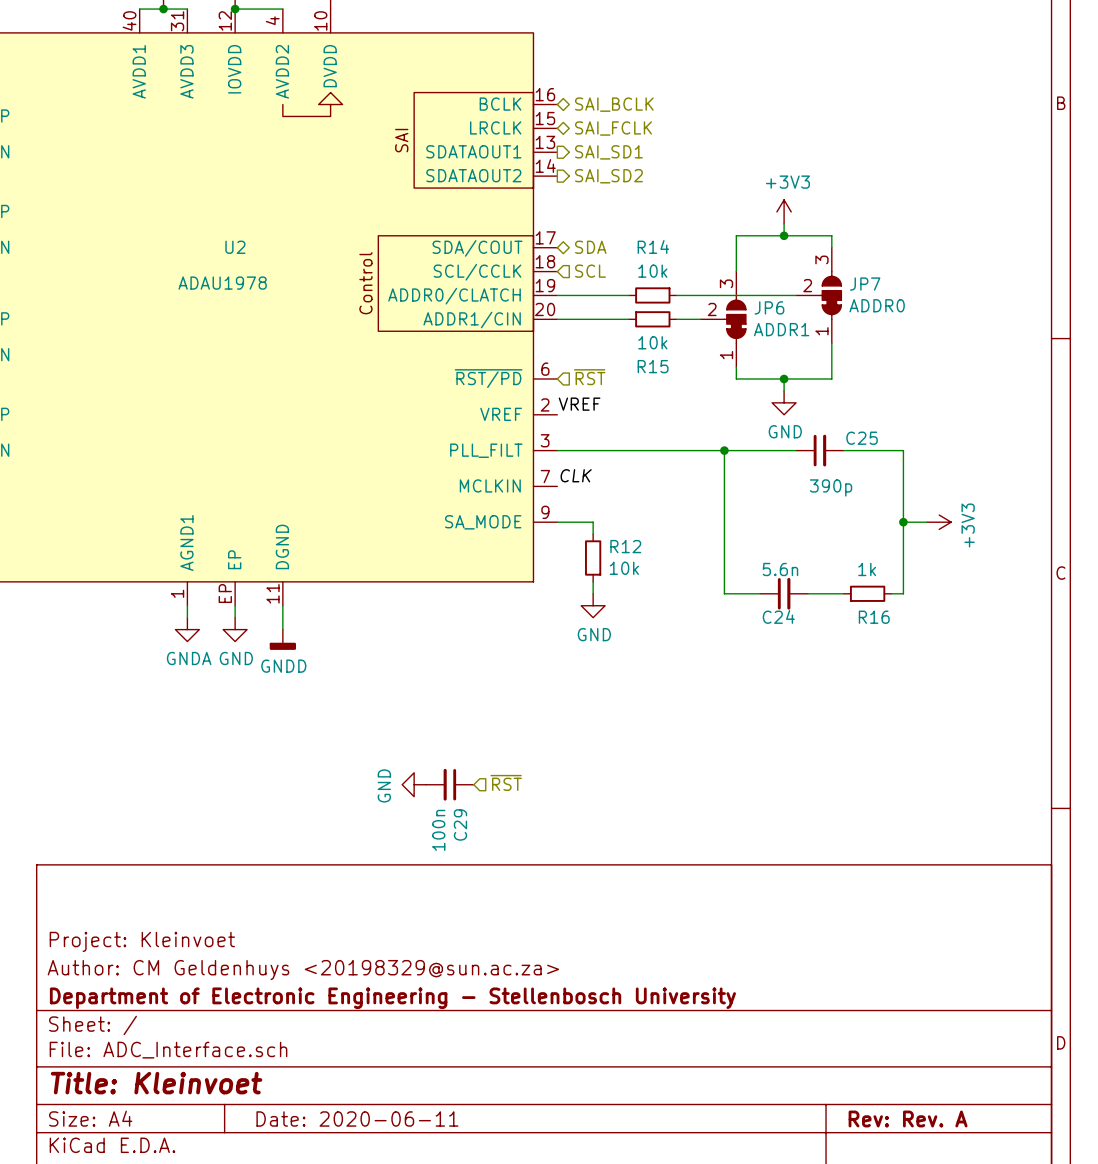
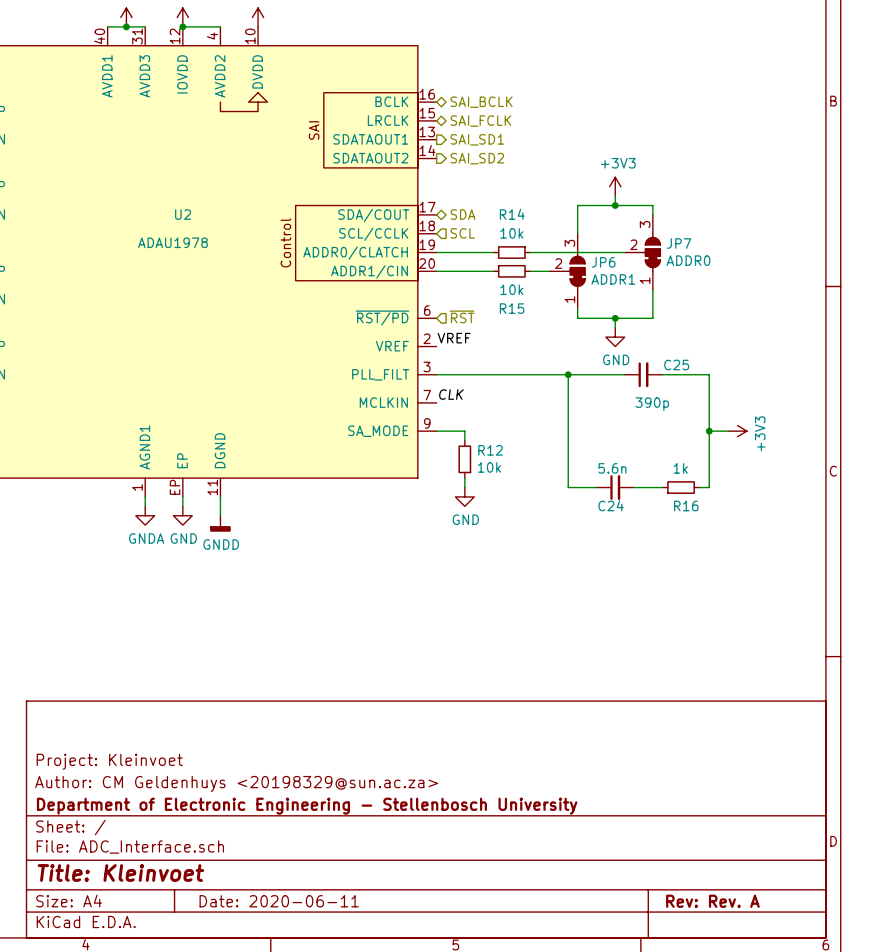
hierarchical label: ~{RST} (506, 782) -> none
power symbol: GND (414, 784) -> none
C29: 100n (449, 784) -> none

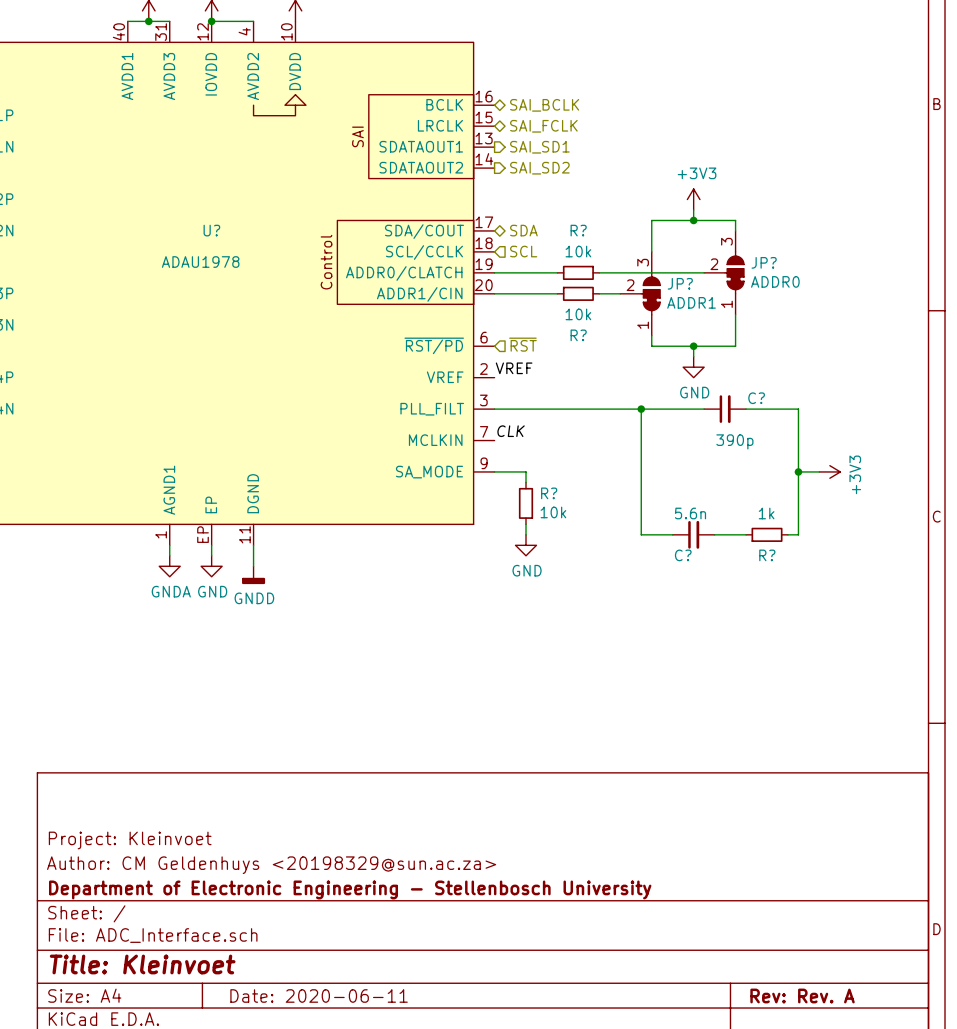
U2 name: U2 (183, 214) -> U? (211, 230)
R14 name: R14 (512, 214) -> R? (578, 230)
JP7 name: JP7 (679, 243) -> JP? (764, 262)
JP6 name: JP6 (603, 262) -> JP? (680, 283)
R15 name: R15 (512, 308) -> R? (578, 335)
C25 name: C25 (676, 364) -> C? (756, 398)
R12 name: R12 (490, 450) -> R? (549, 493)
C24 name: C24 (611, 505) -> C? (683, 555)
R16 name: R16 (686, 505) -> R? (767, 555)

